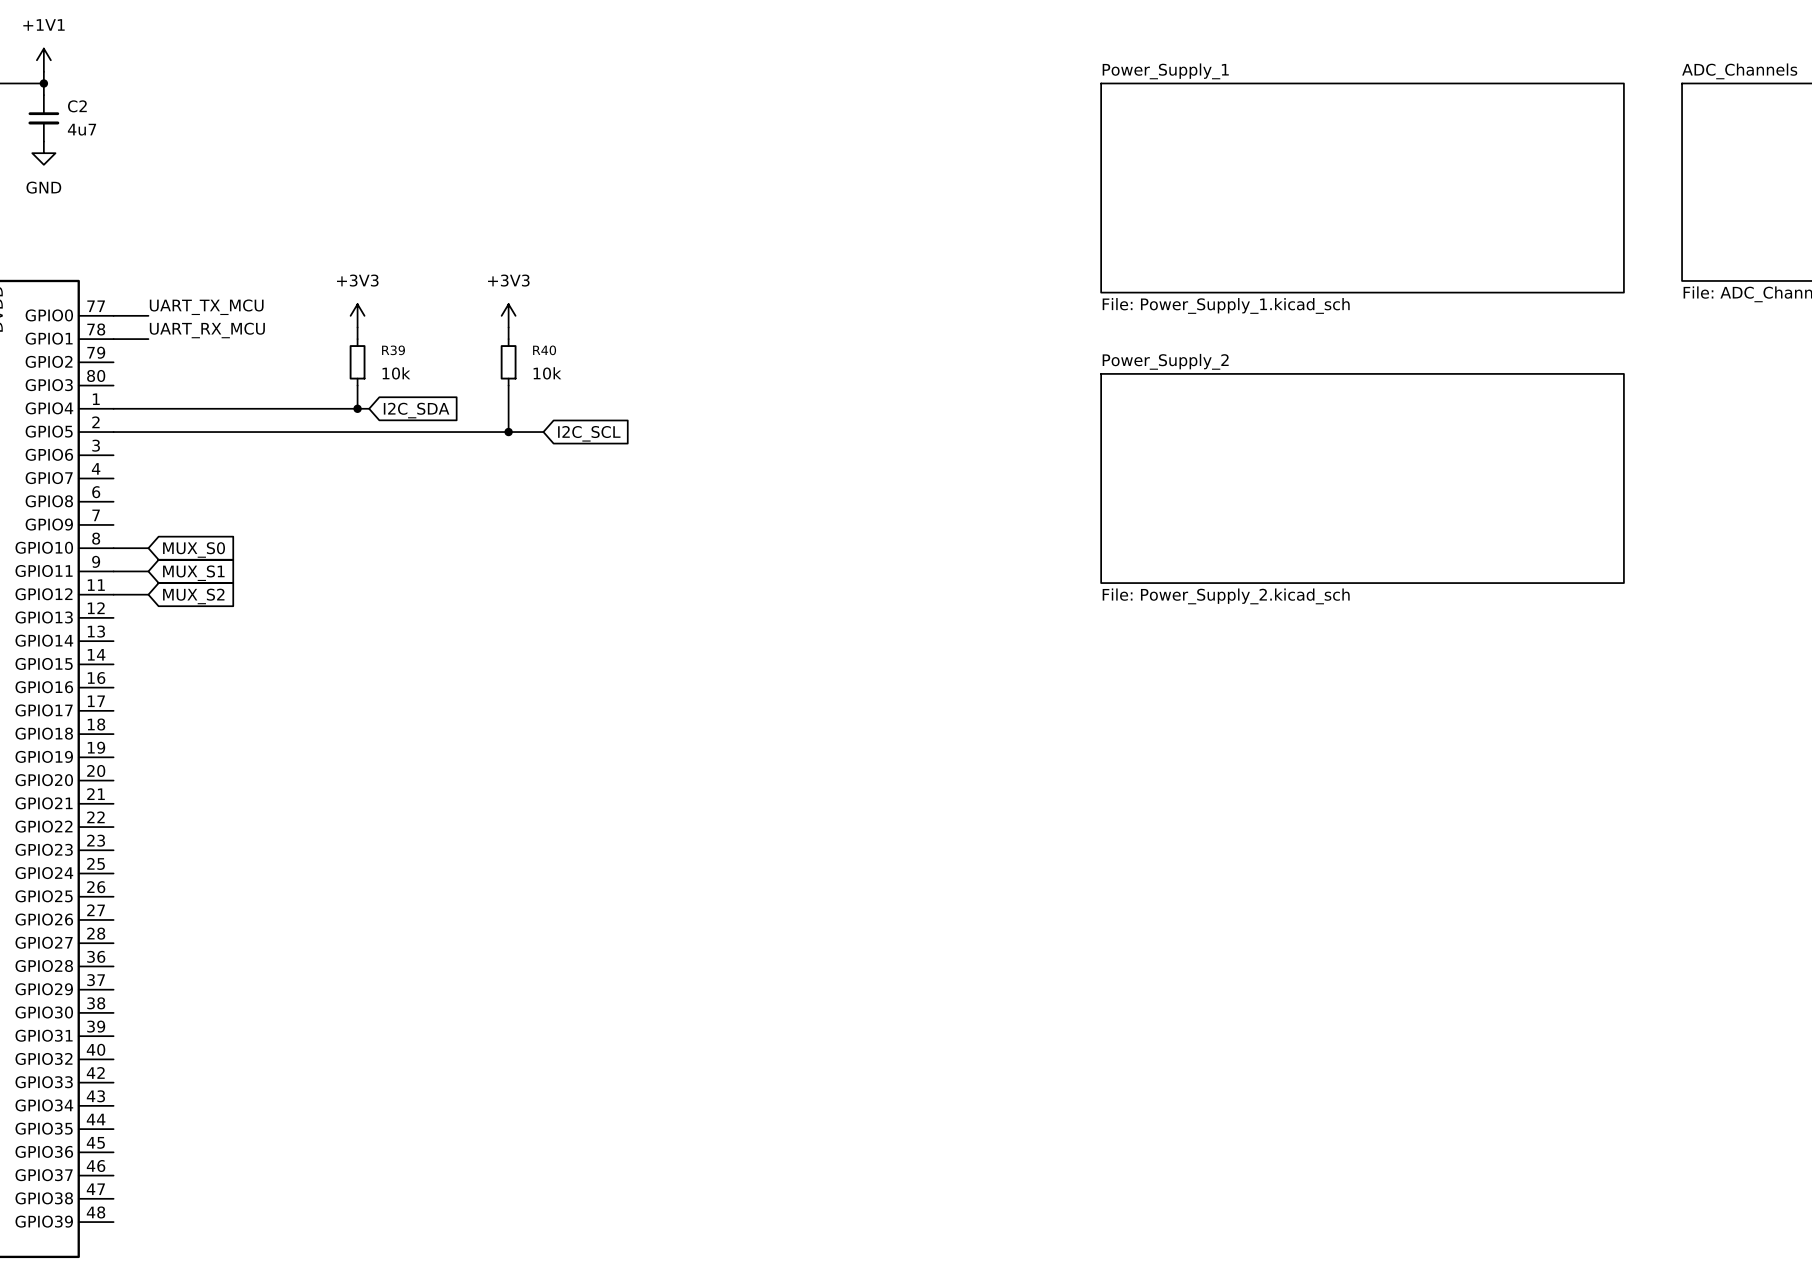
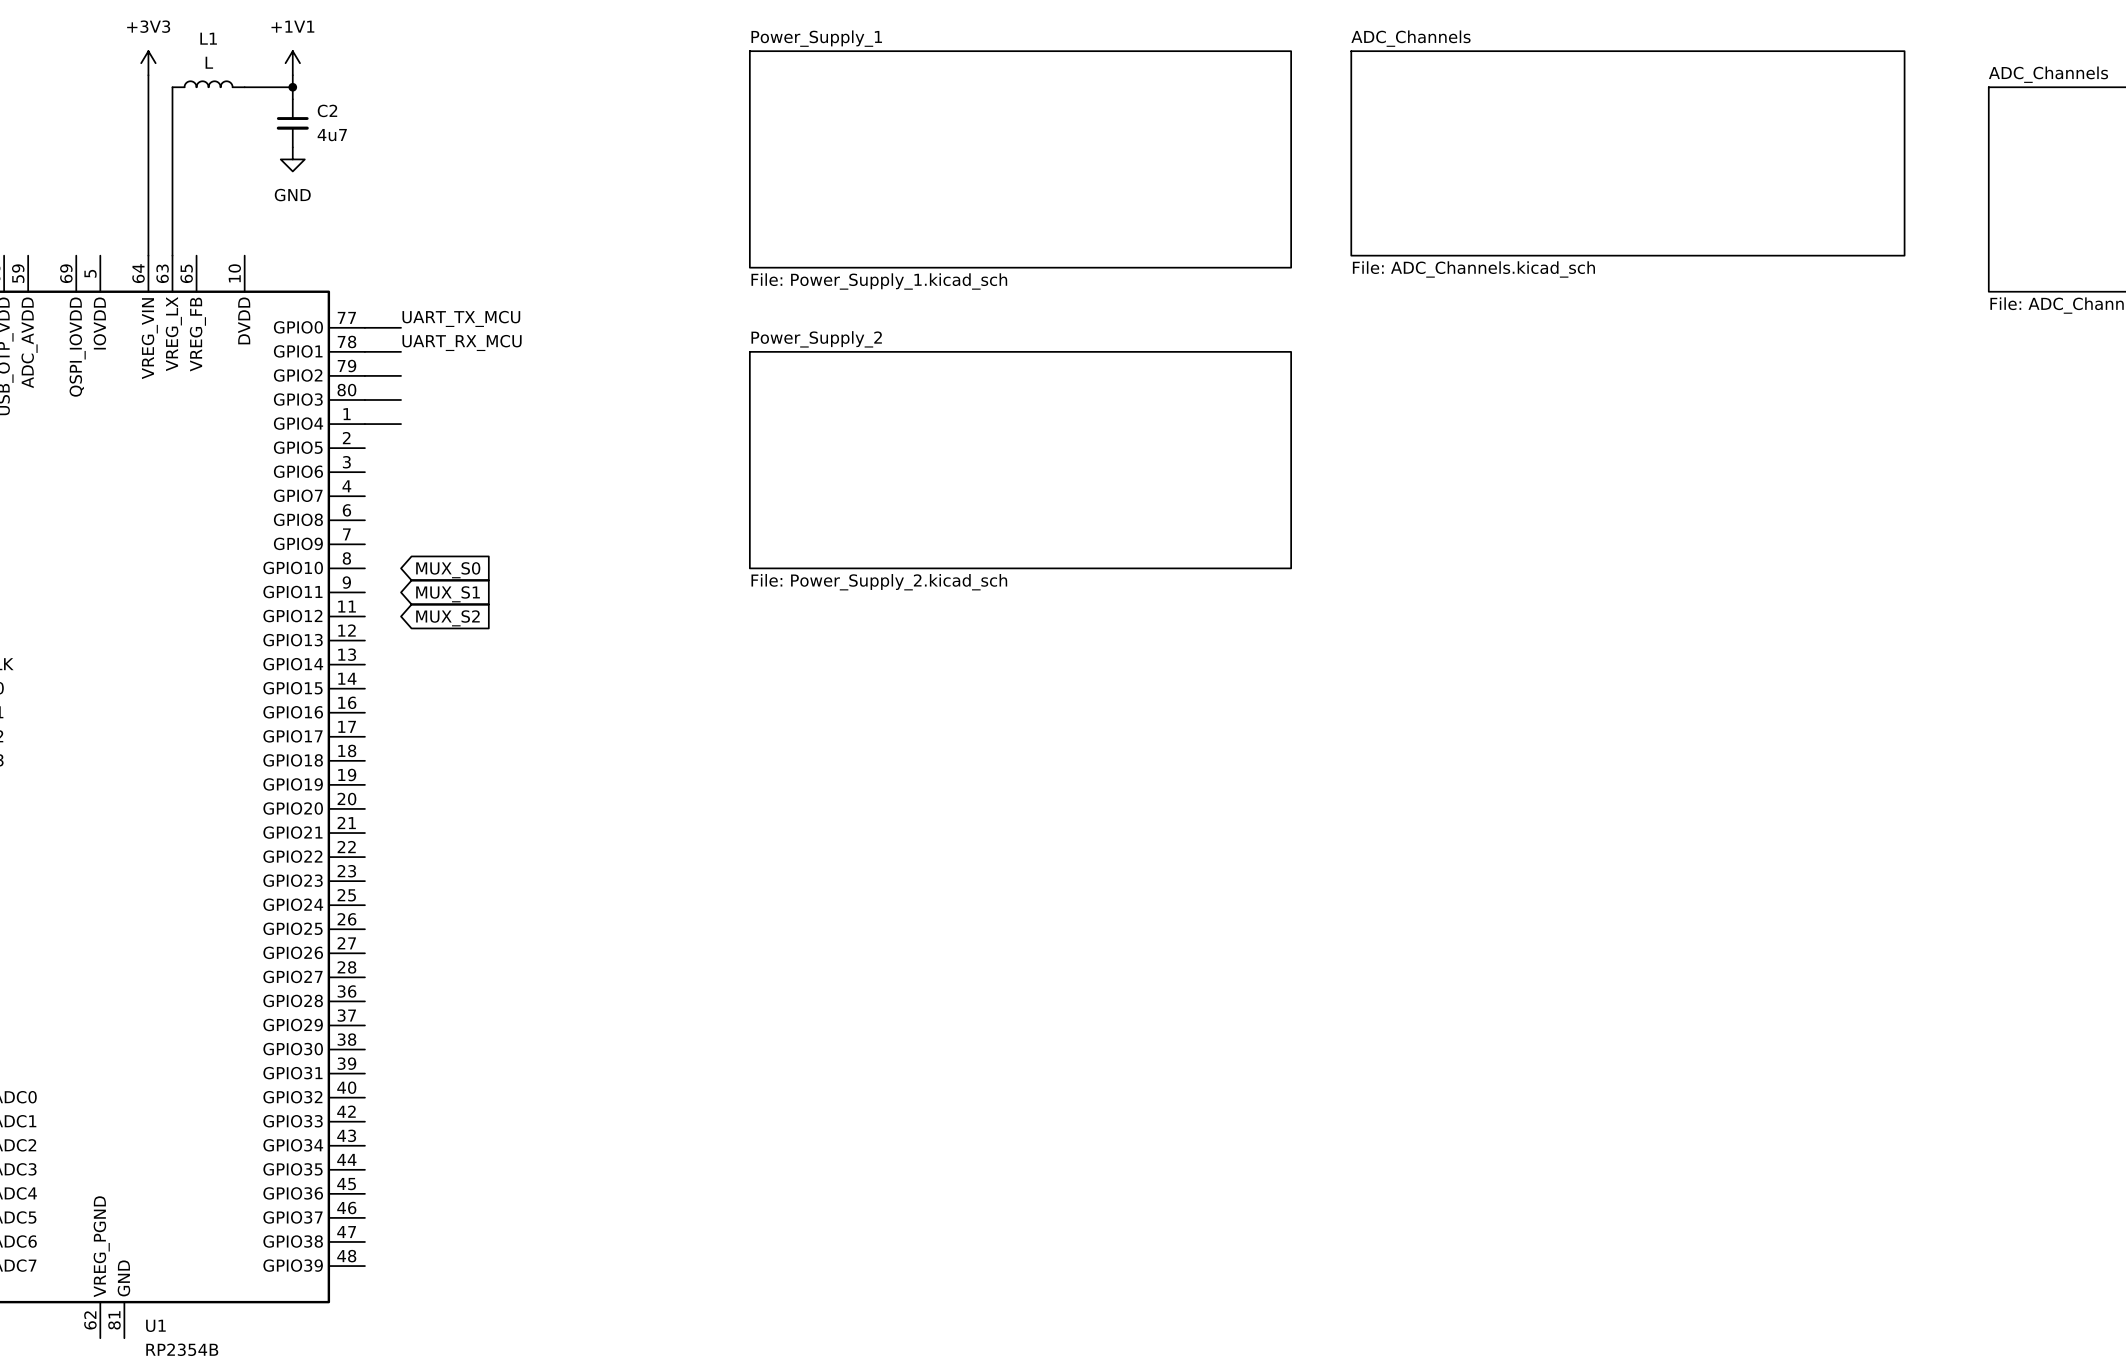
sheet ADC_Channels: none -> File: ADC_Channels.kicad_sch (1627, 153)
sheet Power_Supply_1 position: (1362, 188) -> (1020, 159)
power symbol: +3V3 (357, 315) -> none
power symbol: +3V3 (508, 315) -> none
wire: (357, 327) (357, 339) -> none
wire: (508, 327) (508, 339) -> none
R39: 10k (357, 362) -> none
R40: 10k (508, 362) -> none
wire: (357, 385) (357, 408) -> none
wire: (508, 385) (508, 432) -> none
wire: (148, 408) (369, 408) -> none
junction: (357, 408) -> none
global label: I2C_SDA (416, 410) -> none
wire: (113, 432) (543, 432) -> none
junction: (508, 432) -> none
global label: I2C_SCL (589, 433) -> none
sheet Power_Supply_2 position: (1362, 478) -> (1020, 460)
wire: (113, 548) (148, 548) -> (364, 375) (401, 375)
wire: (113, 571) (148, 571) -> (364, 399) (401, 399)
wire: (113, 594) (148, 594) -> none

